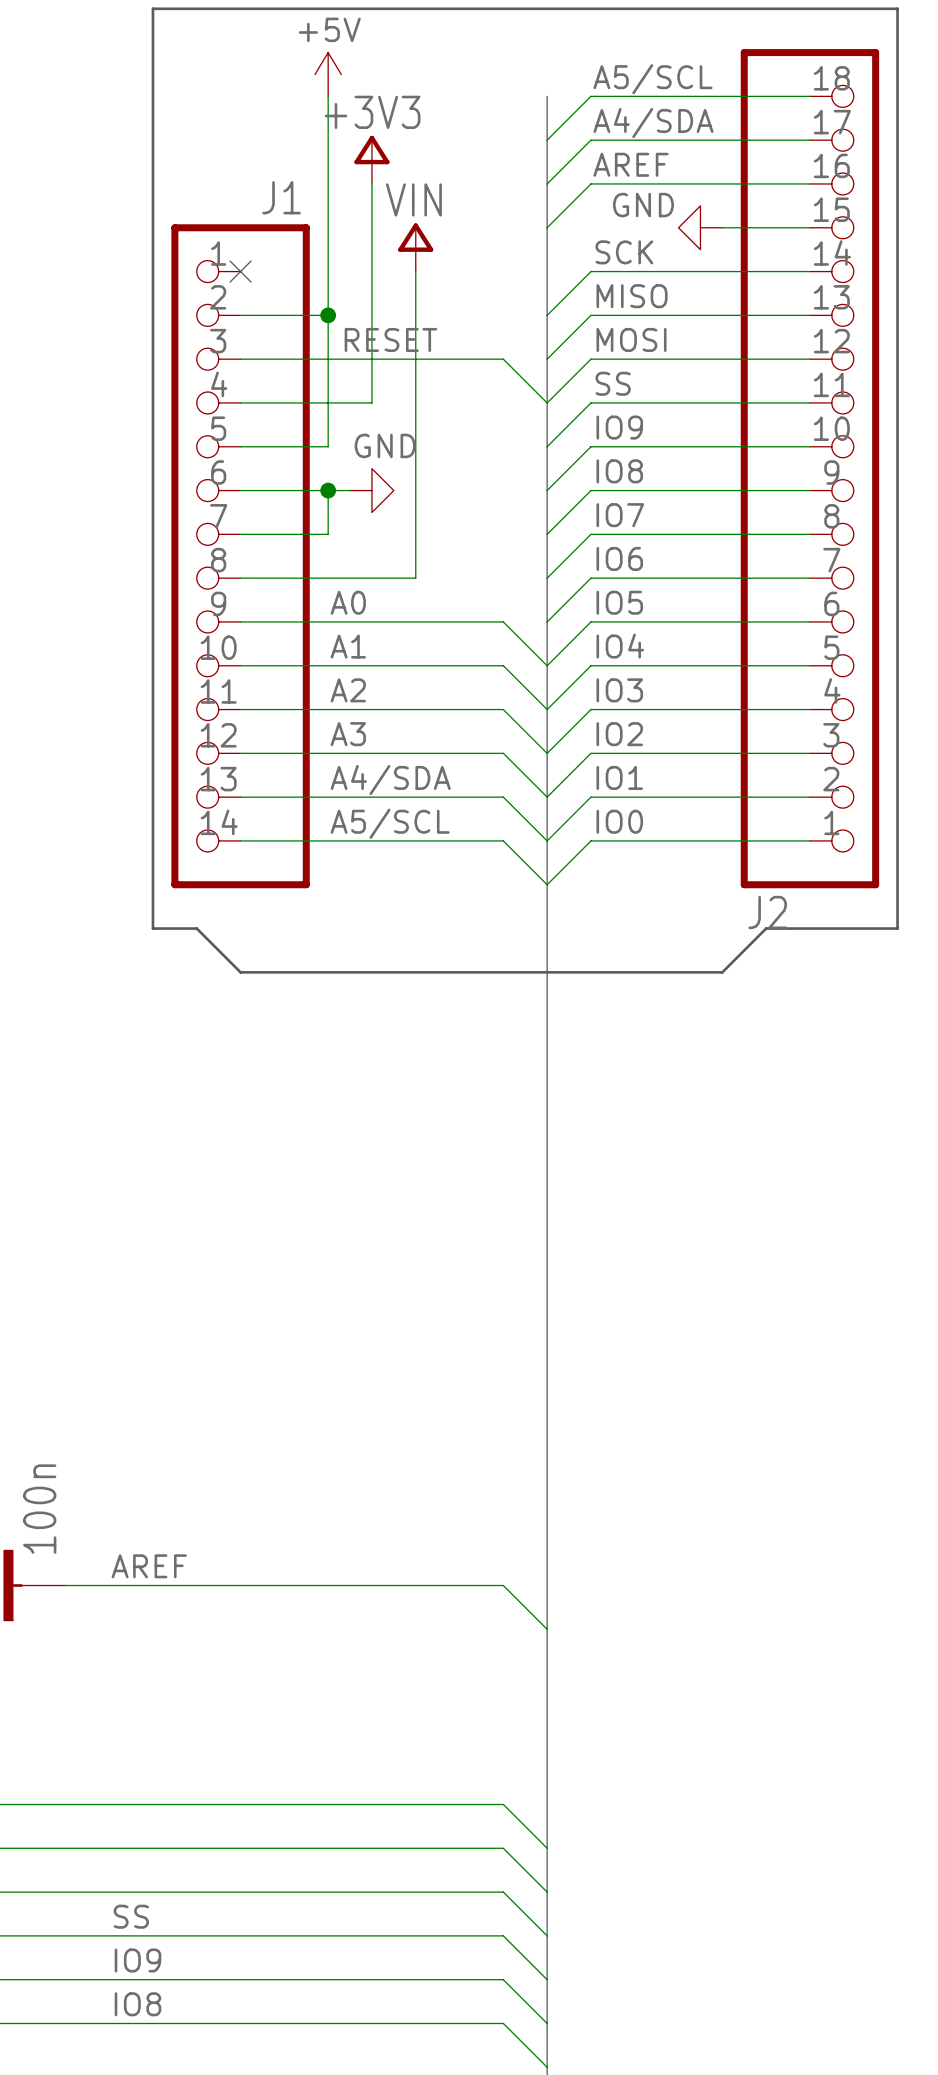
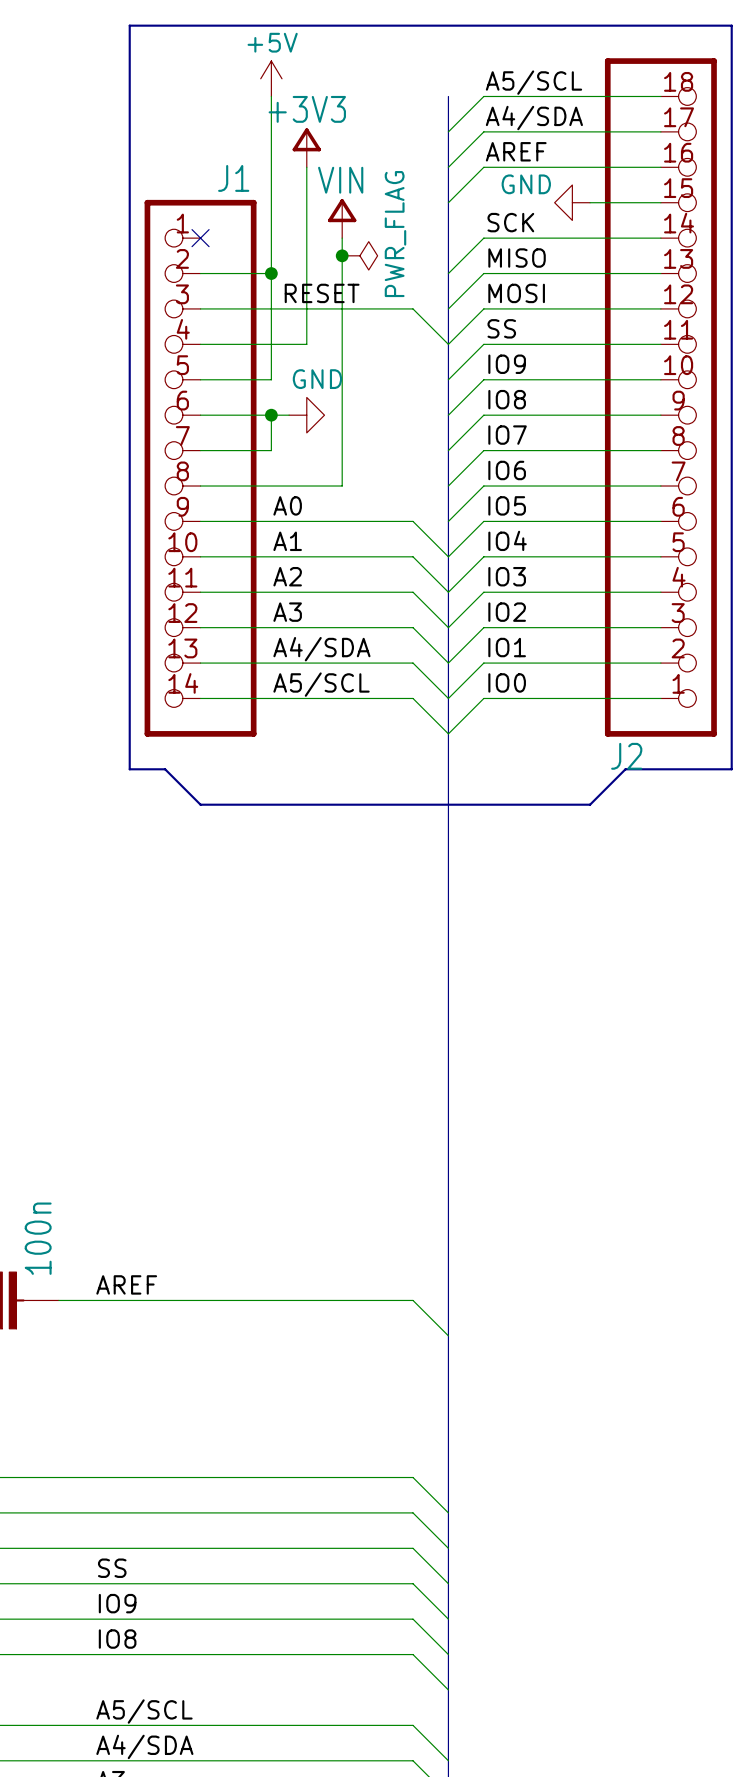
junction: none -> (342, 255)
power symbol: none -> PWR_FLAG (359, 255)

